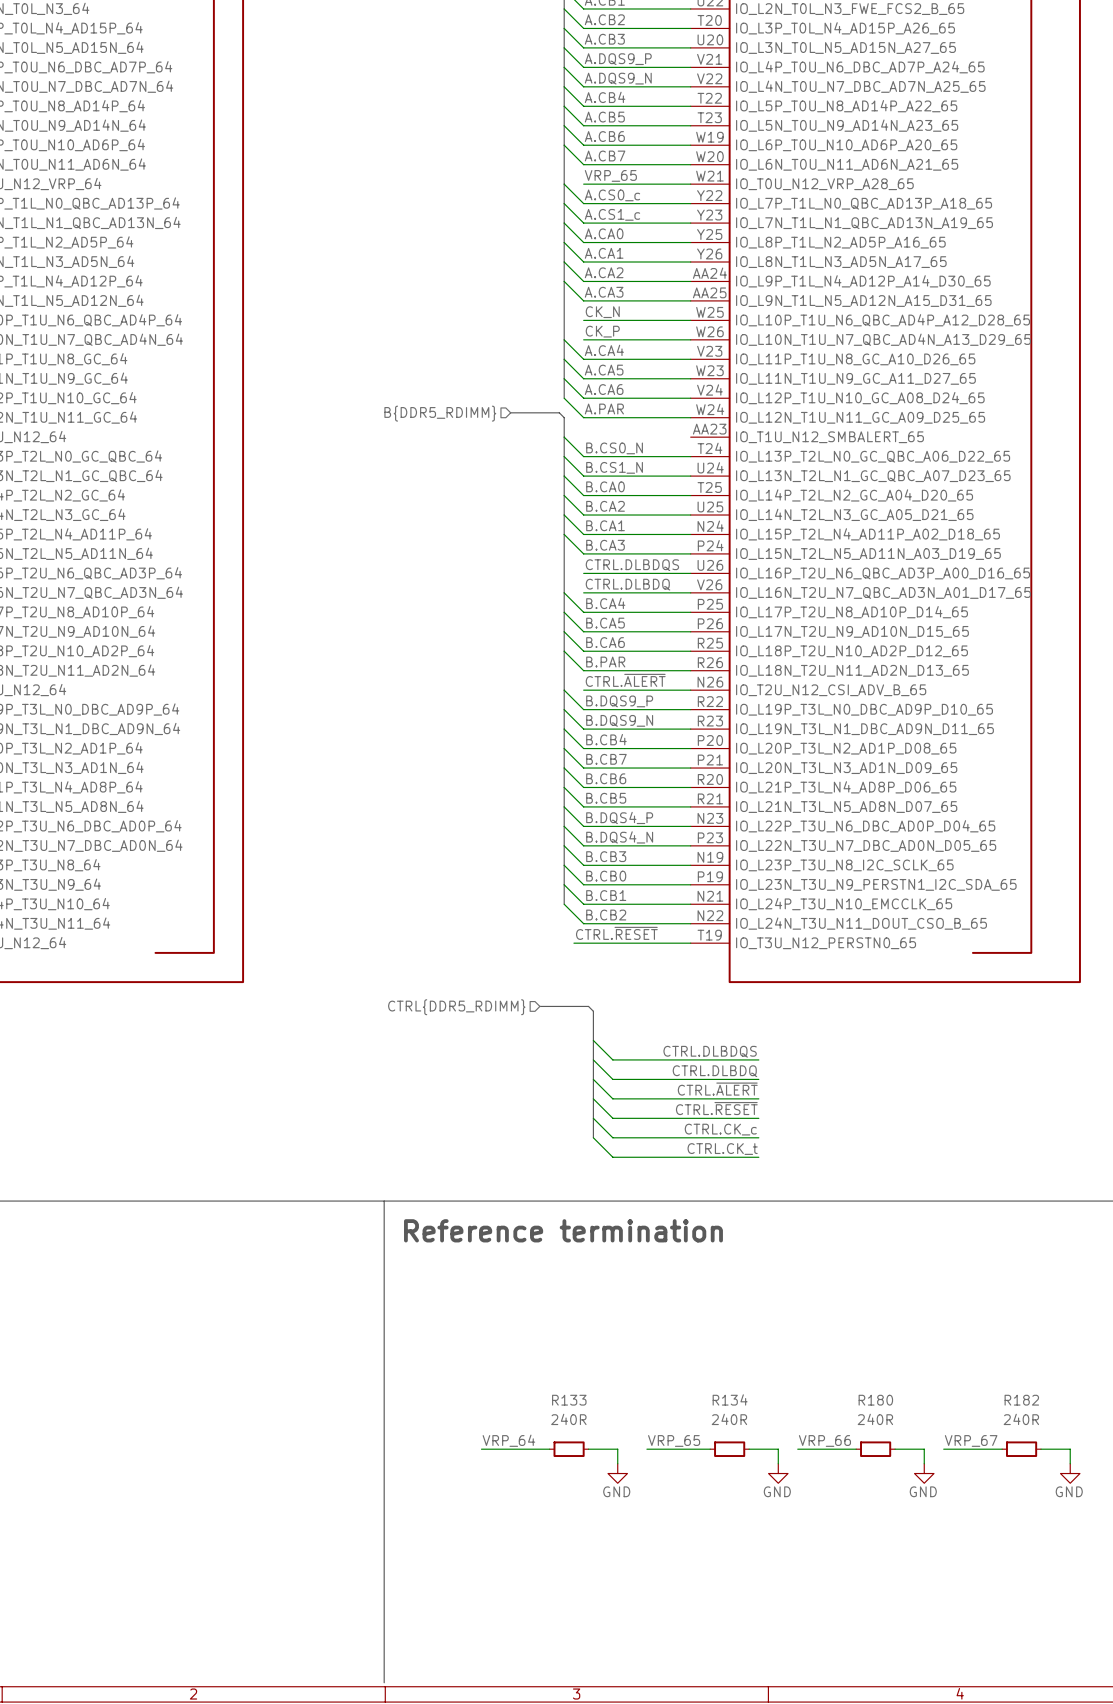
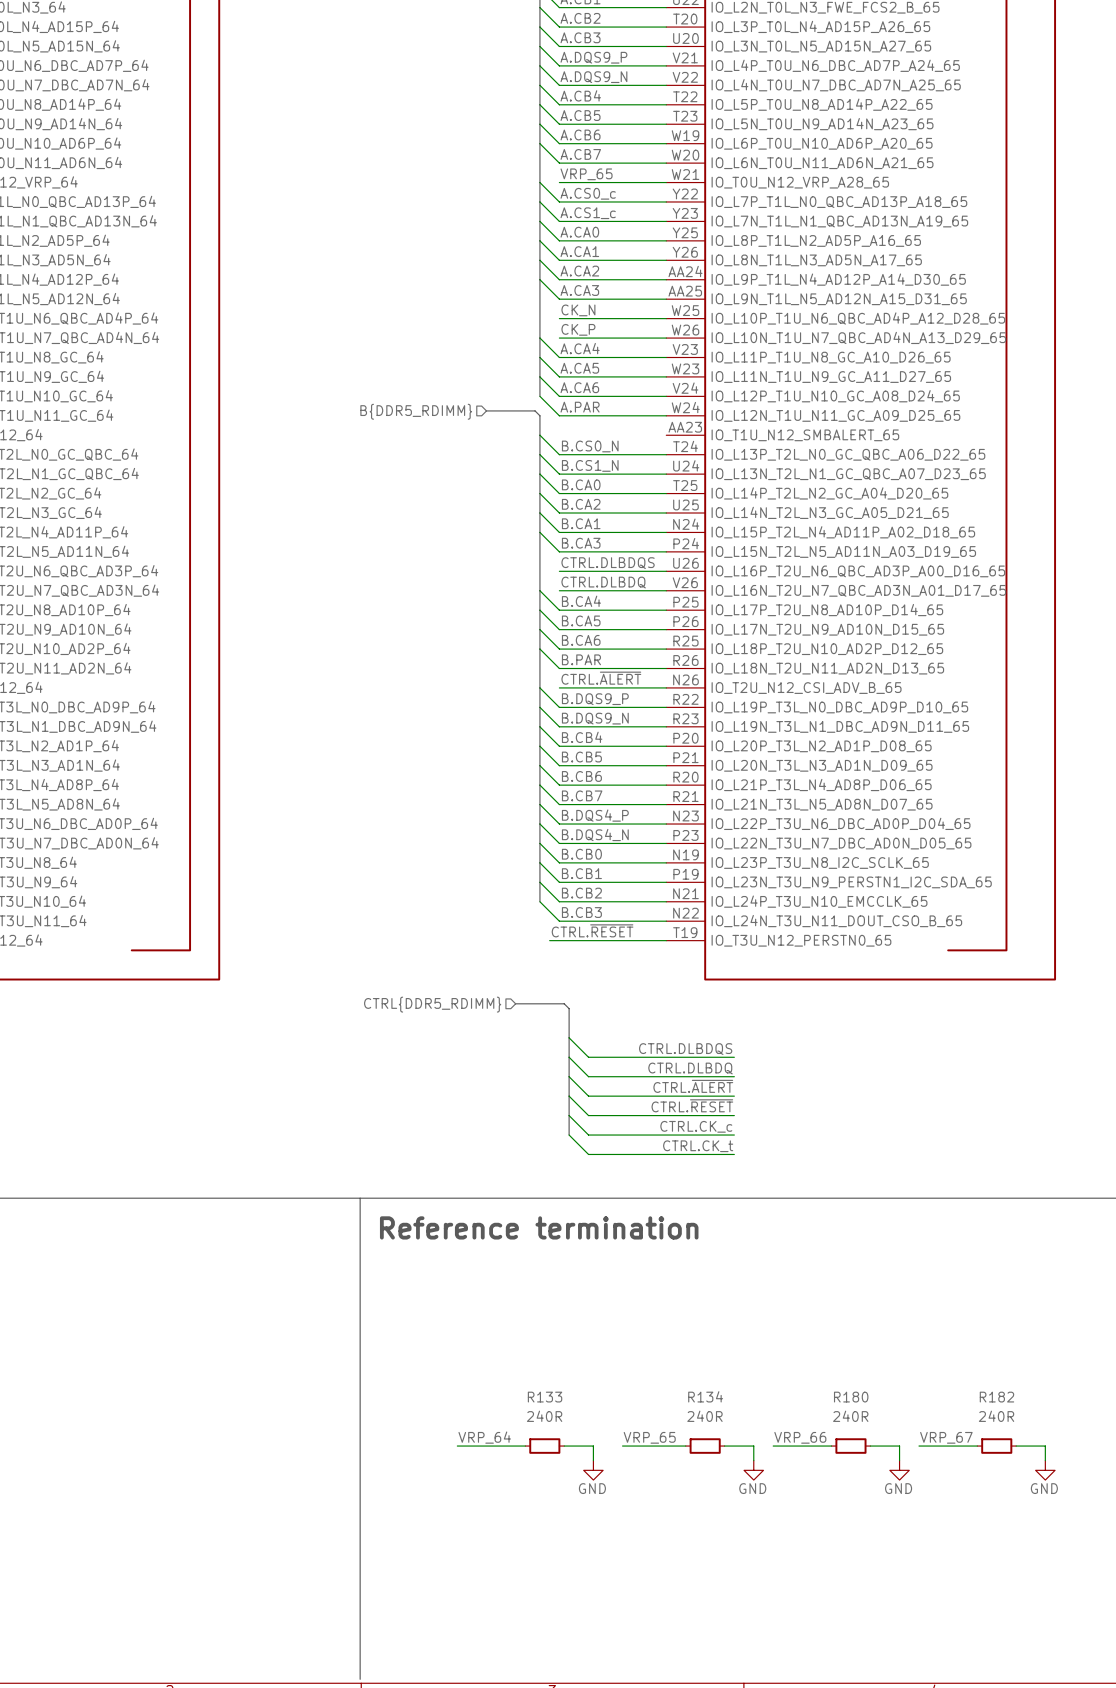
label: B.CB7 (606, 759) -> B.CB5 (581, 757)
label: B.CB5 (606, 798) -> B.CB7 (582, 795)
label: B.CB3 (606, 856) -> B.CB0 (581, 854)
label: B.CB0 (606, 876) -> B.CB1 (581, 873)
label: B.CB1 (606, 895) -> B.CB2 (581, 893)
label: B.CB2 (606, 915) -> B.CB3 (581, 912)

